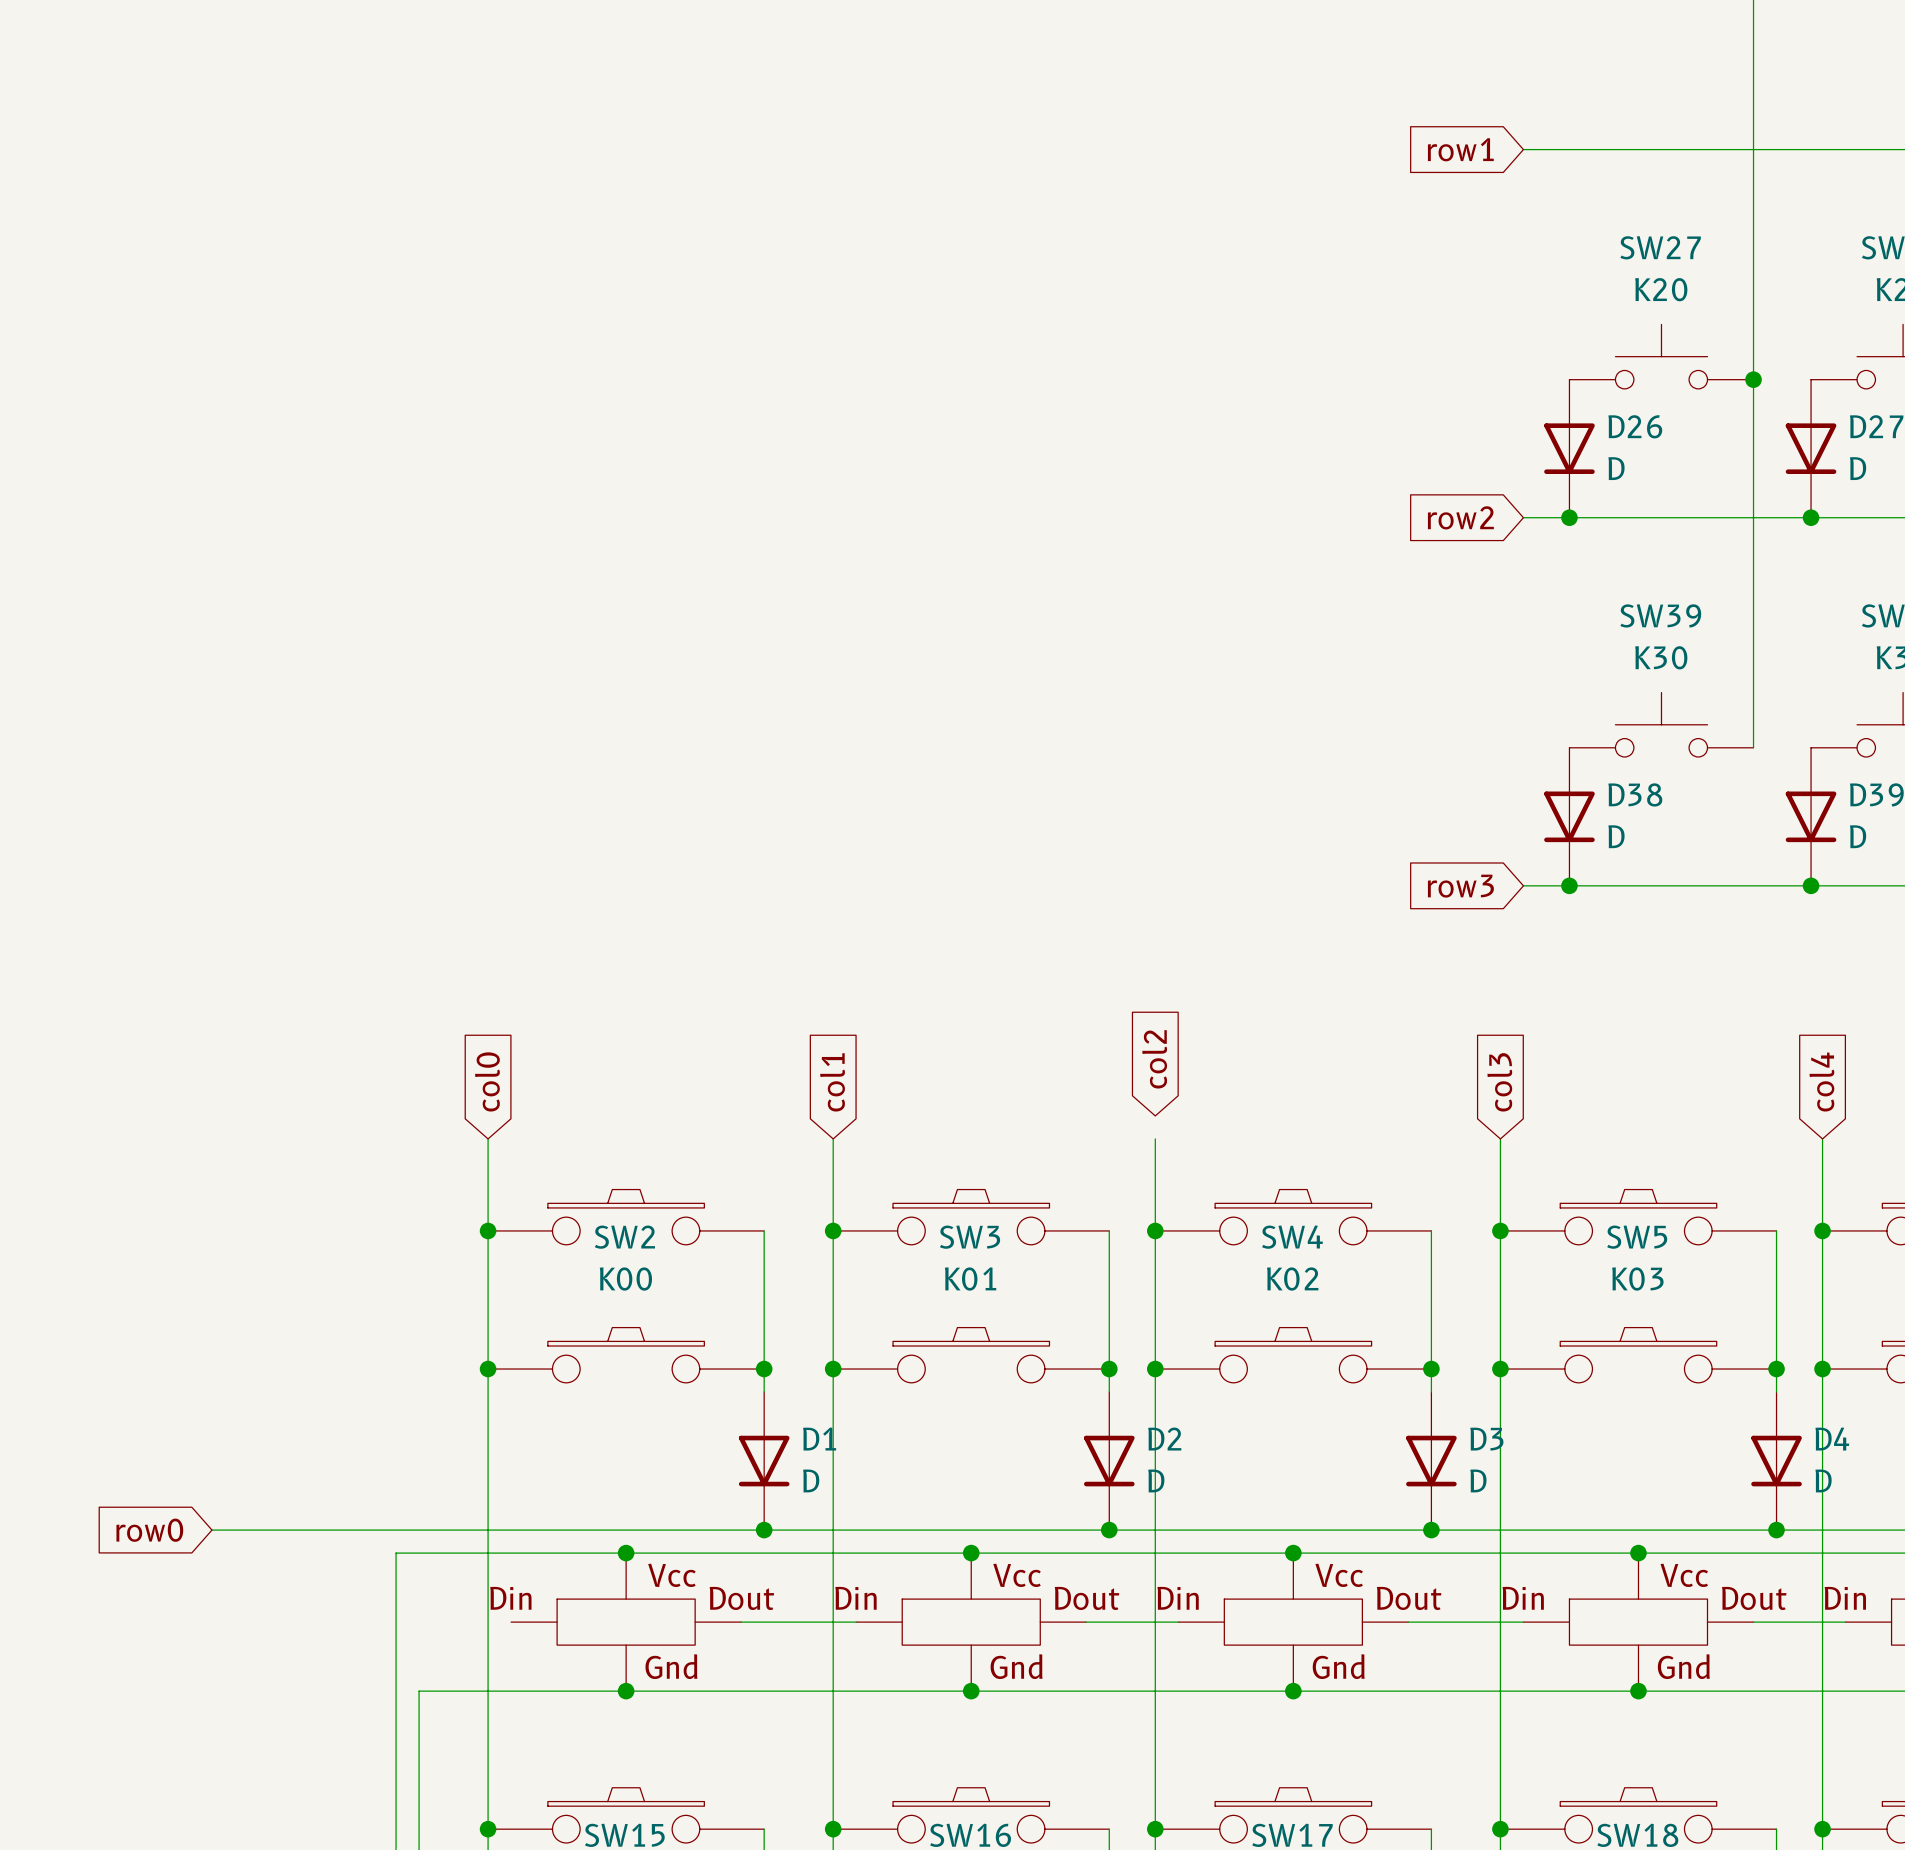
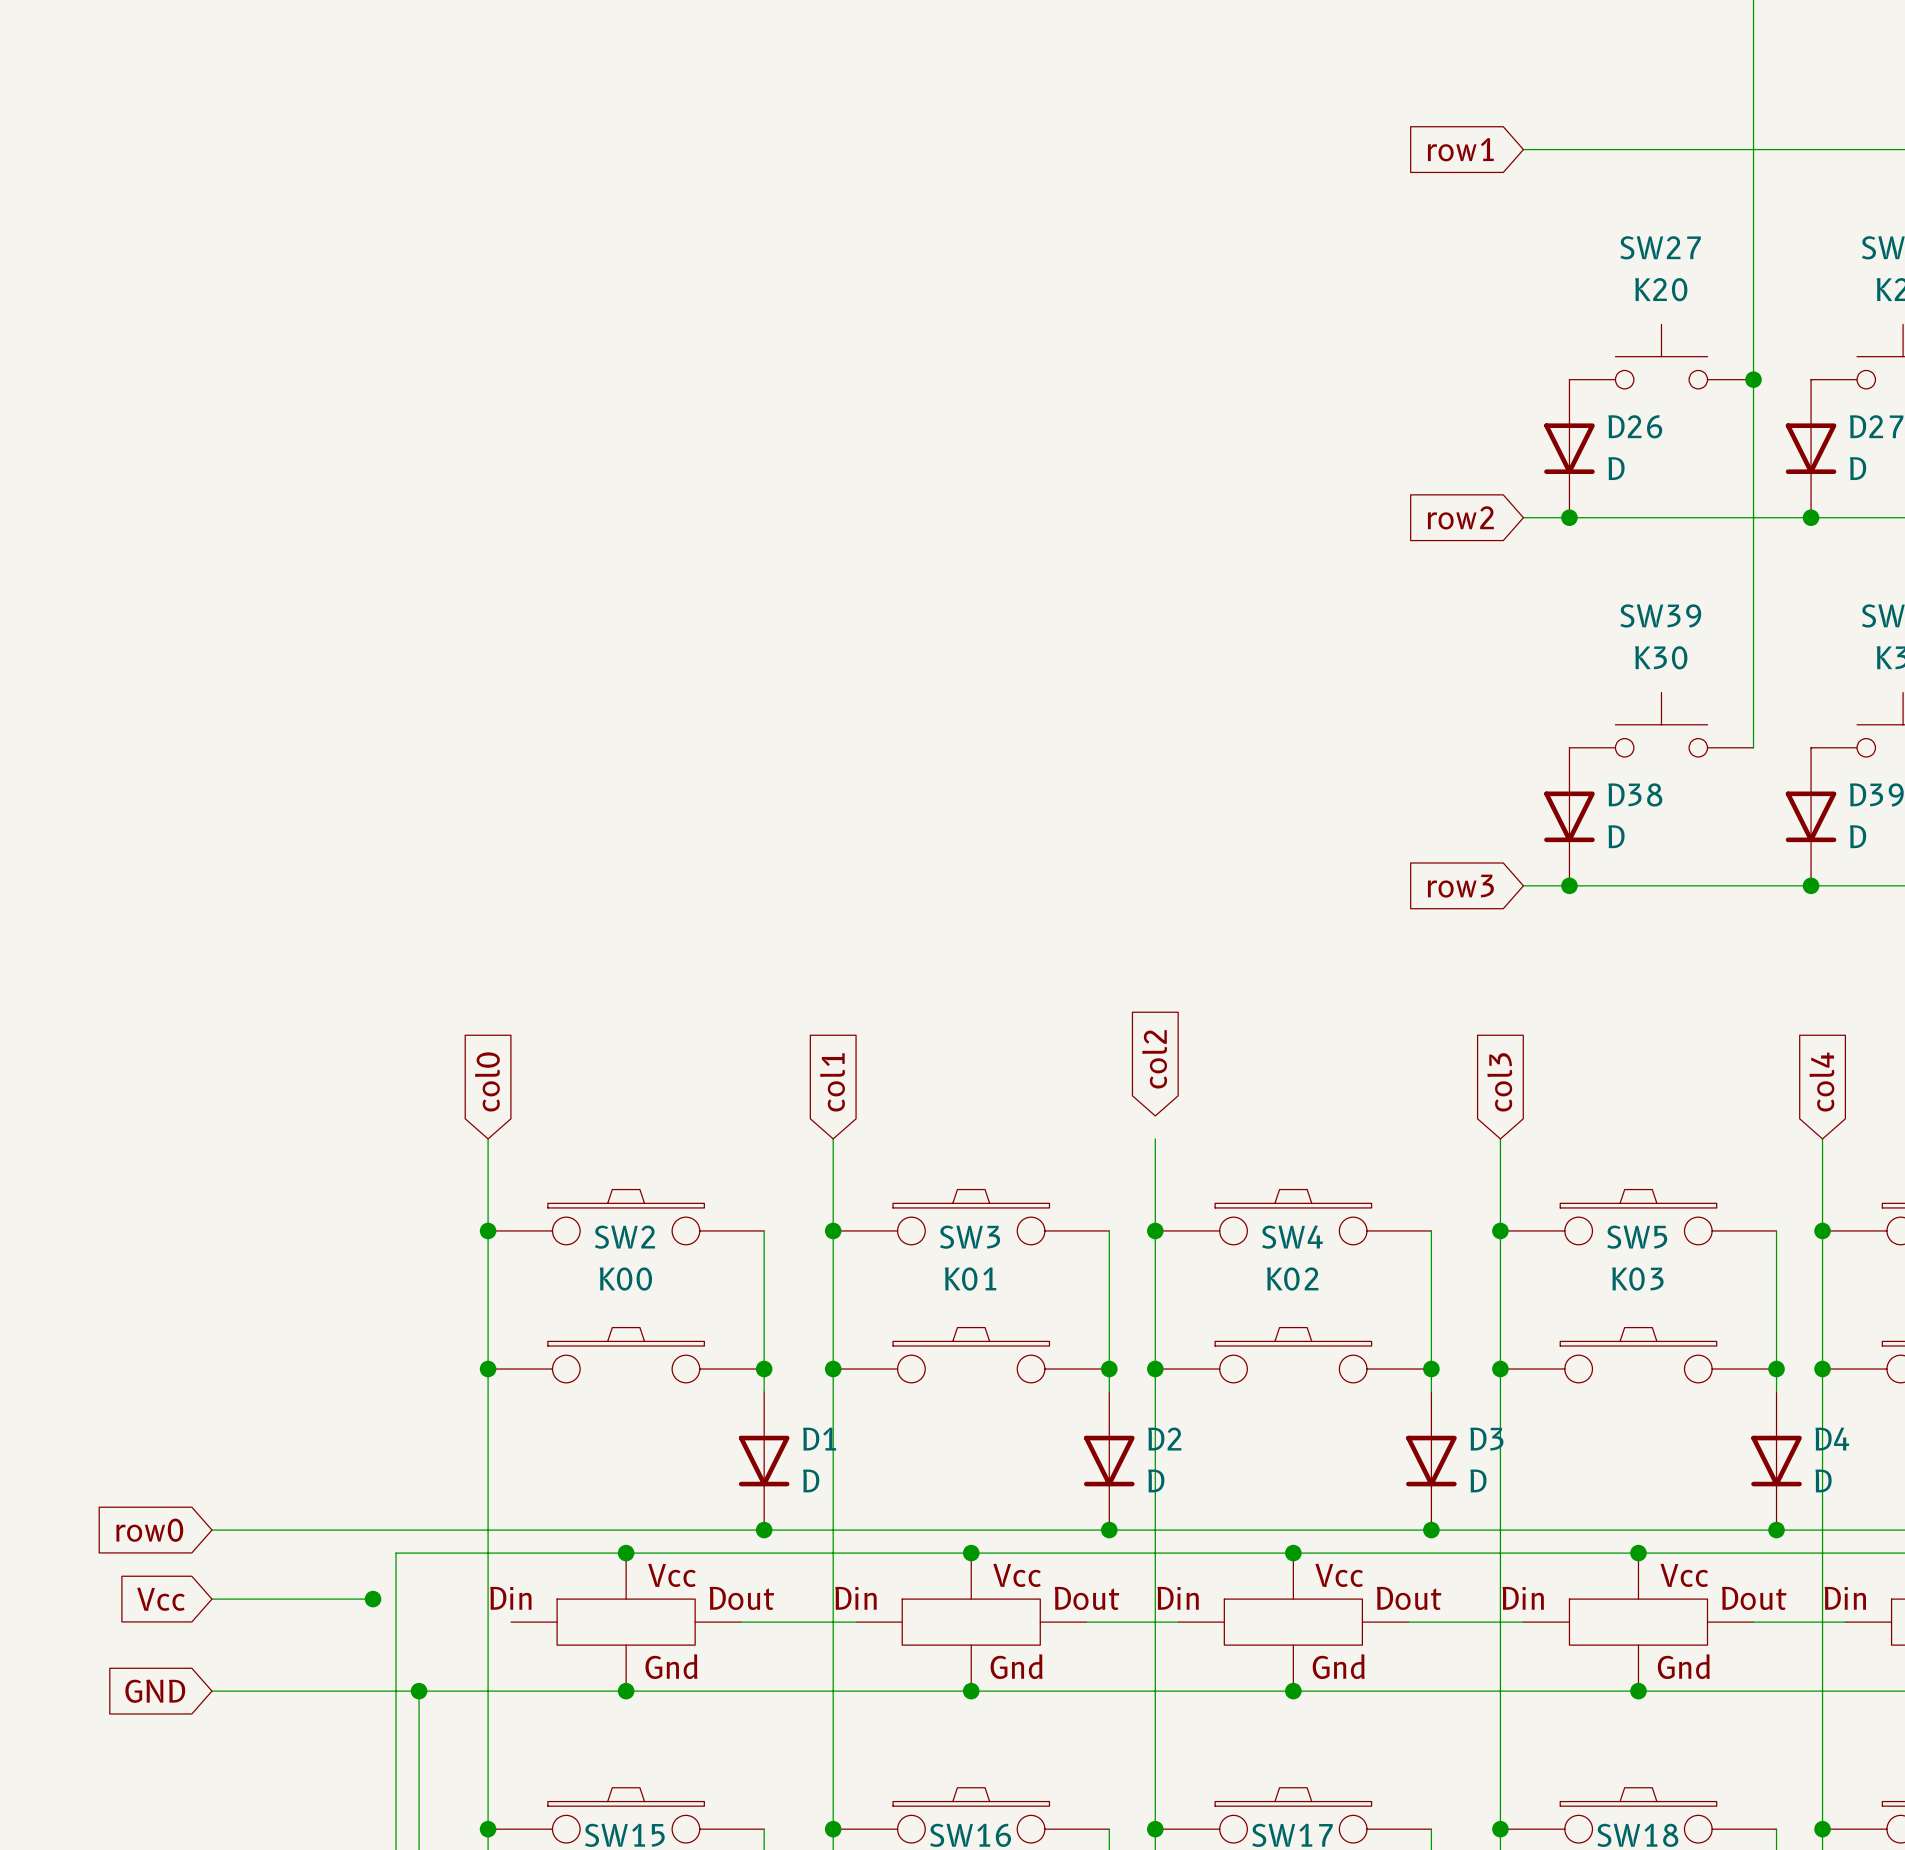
global label: none -> Vcc (160, 1599)
wire: none -> (211, 1599) (373, 1599)
junction: none -> (373, 1599)
global label: none -> GND (155, 1691)
wire: none -> (211, 1691) (419, 1691)
junction: none -> (419, 1691)

